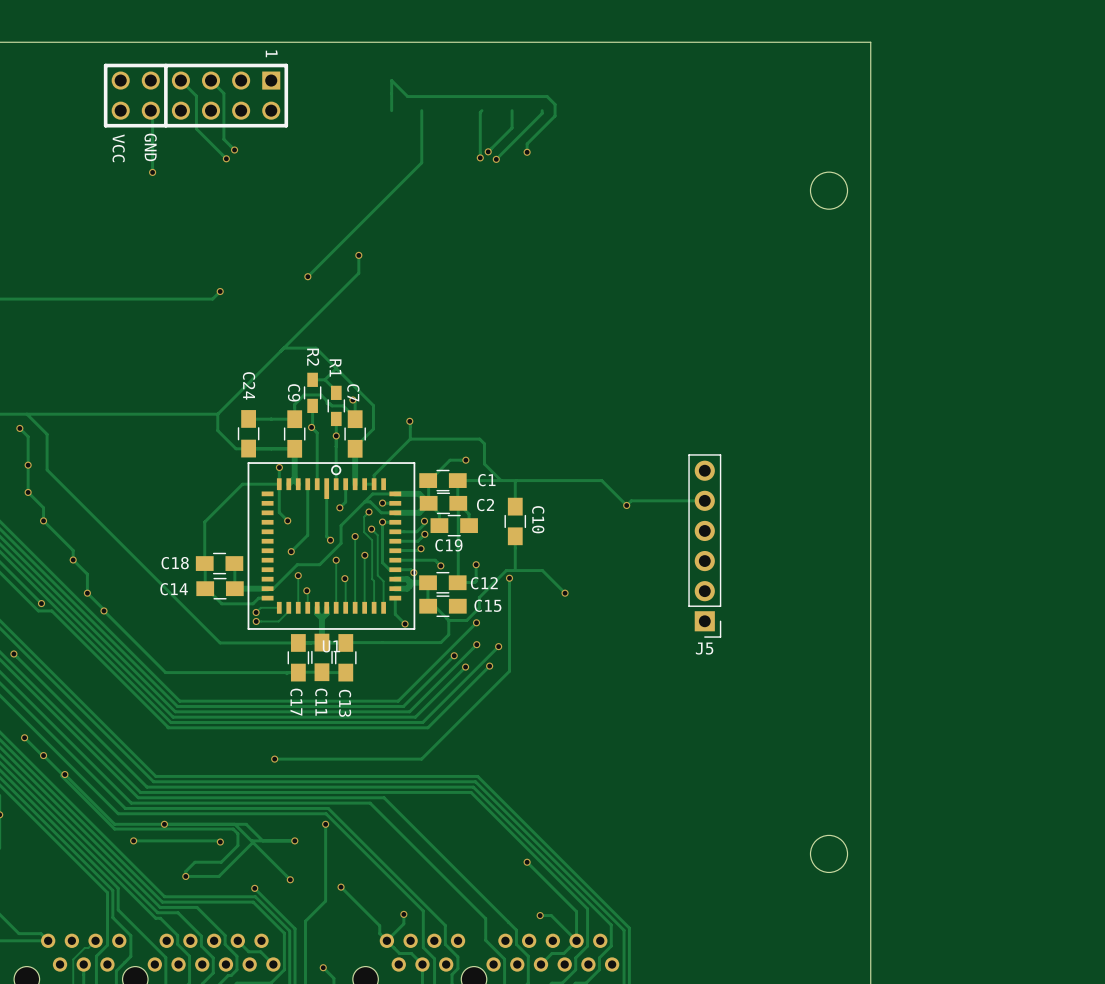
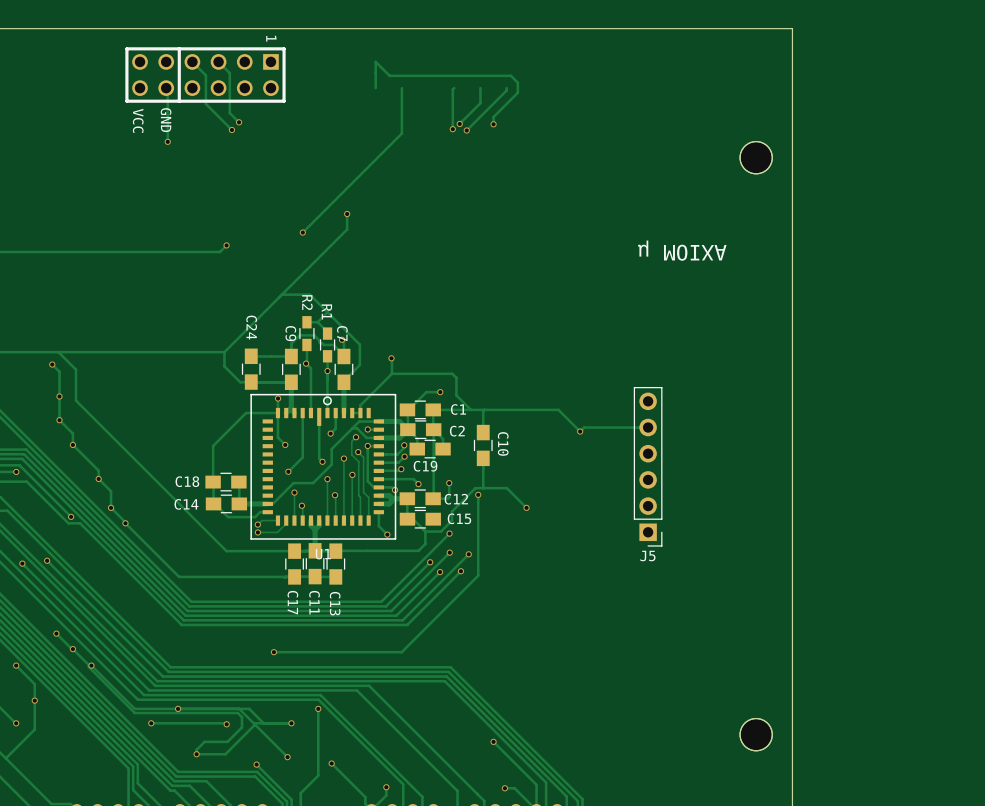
part: none -> (756, 157)
text: none -> AXIOM µ (682, 250)
part: none -> (756, 734)

